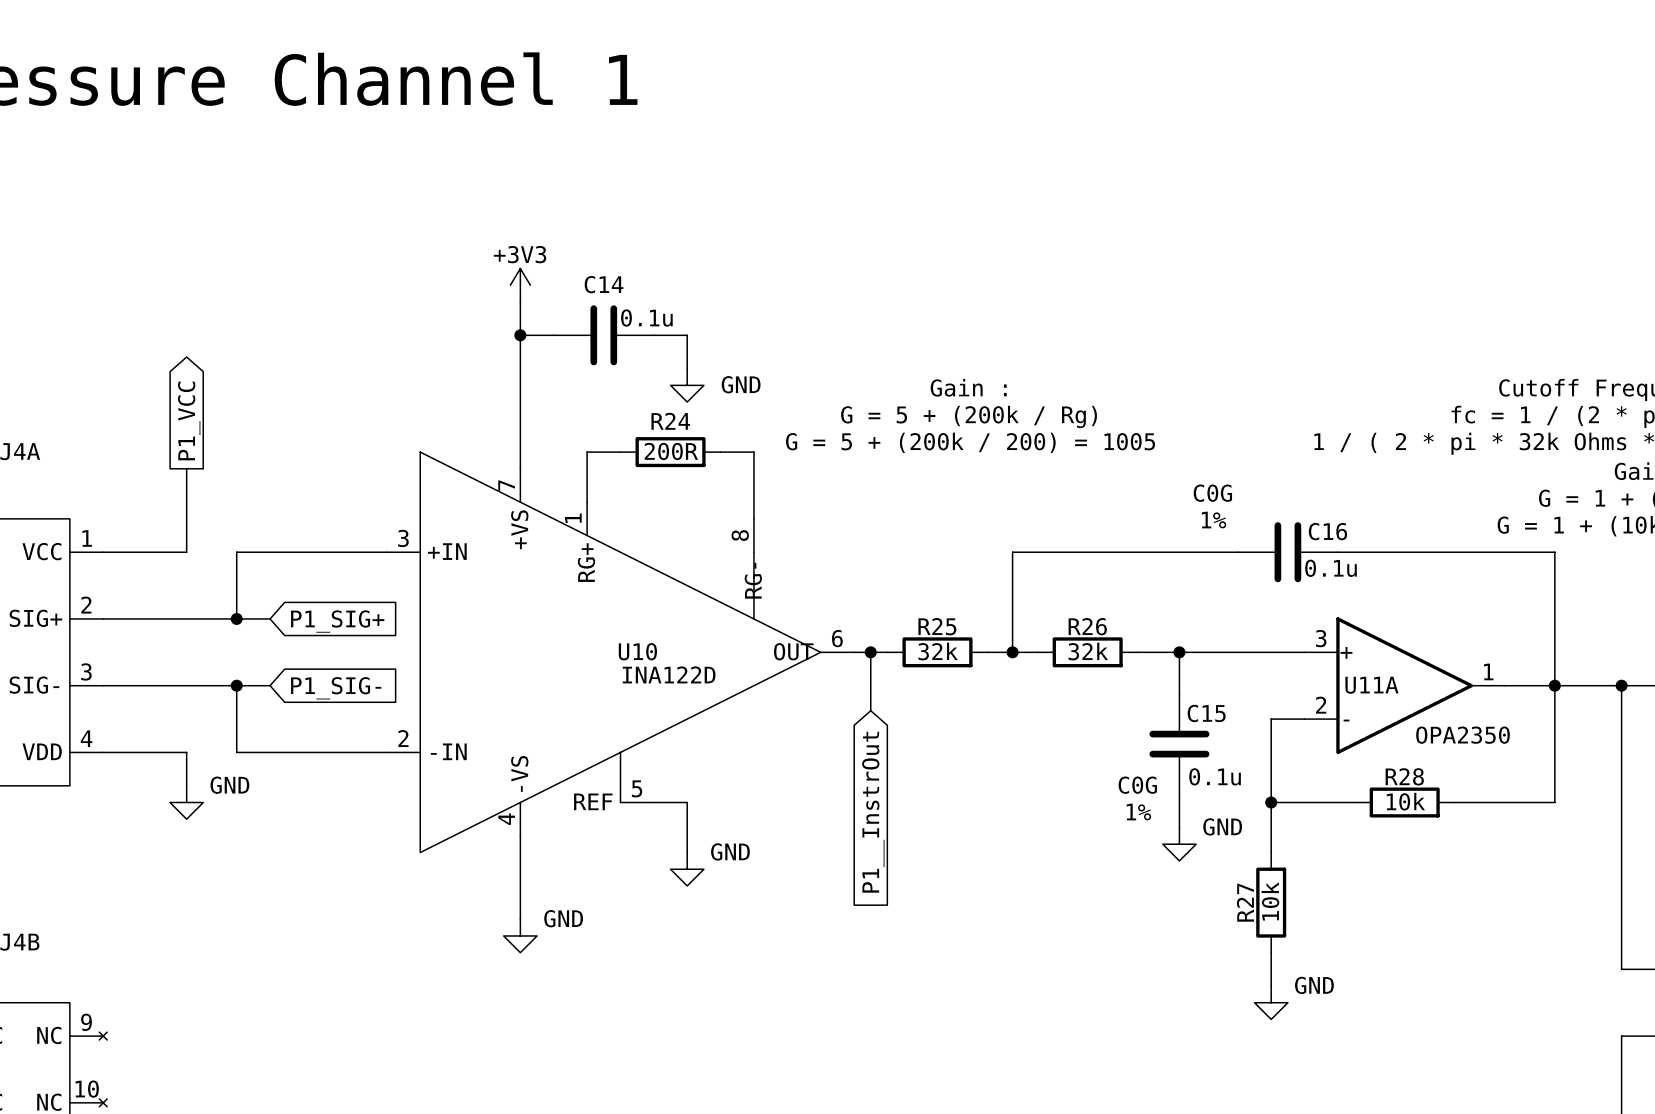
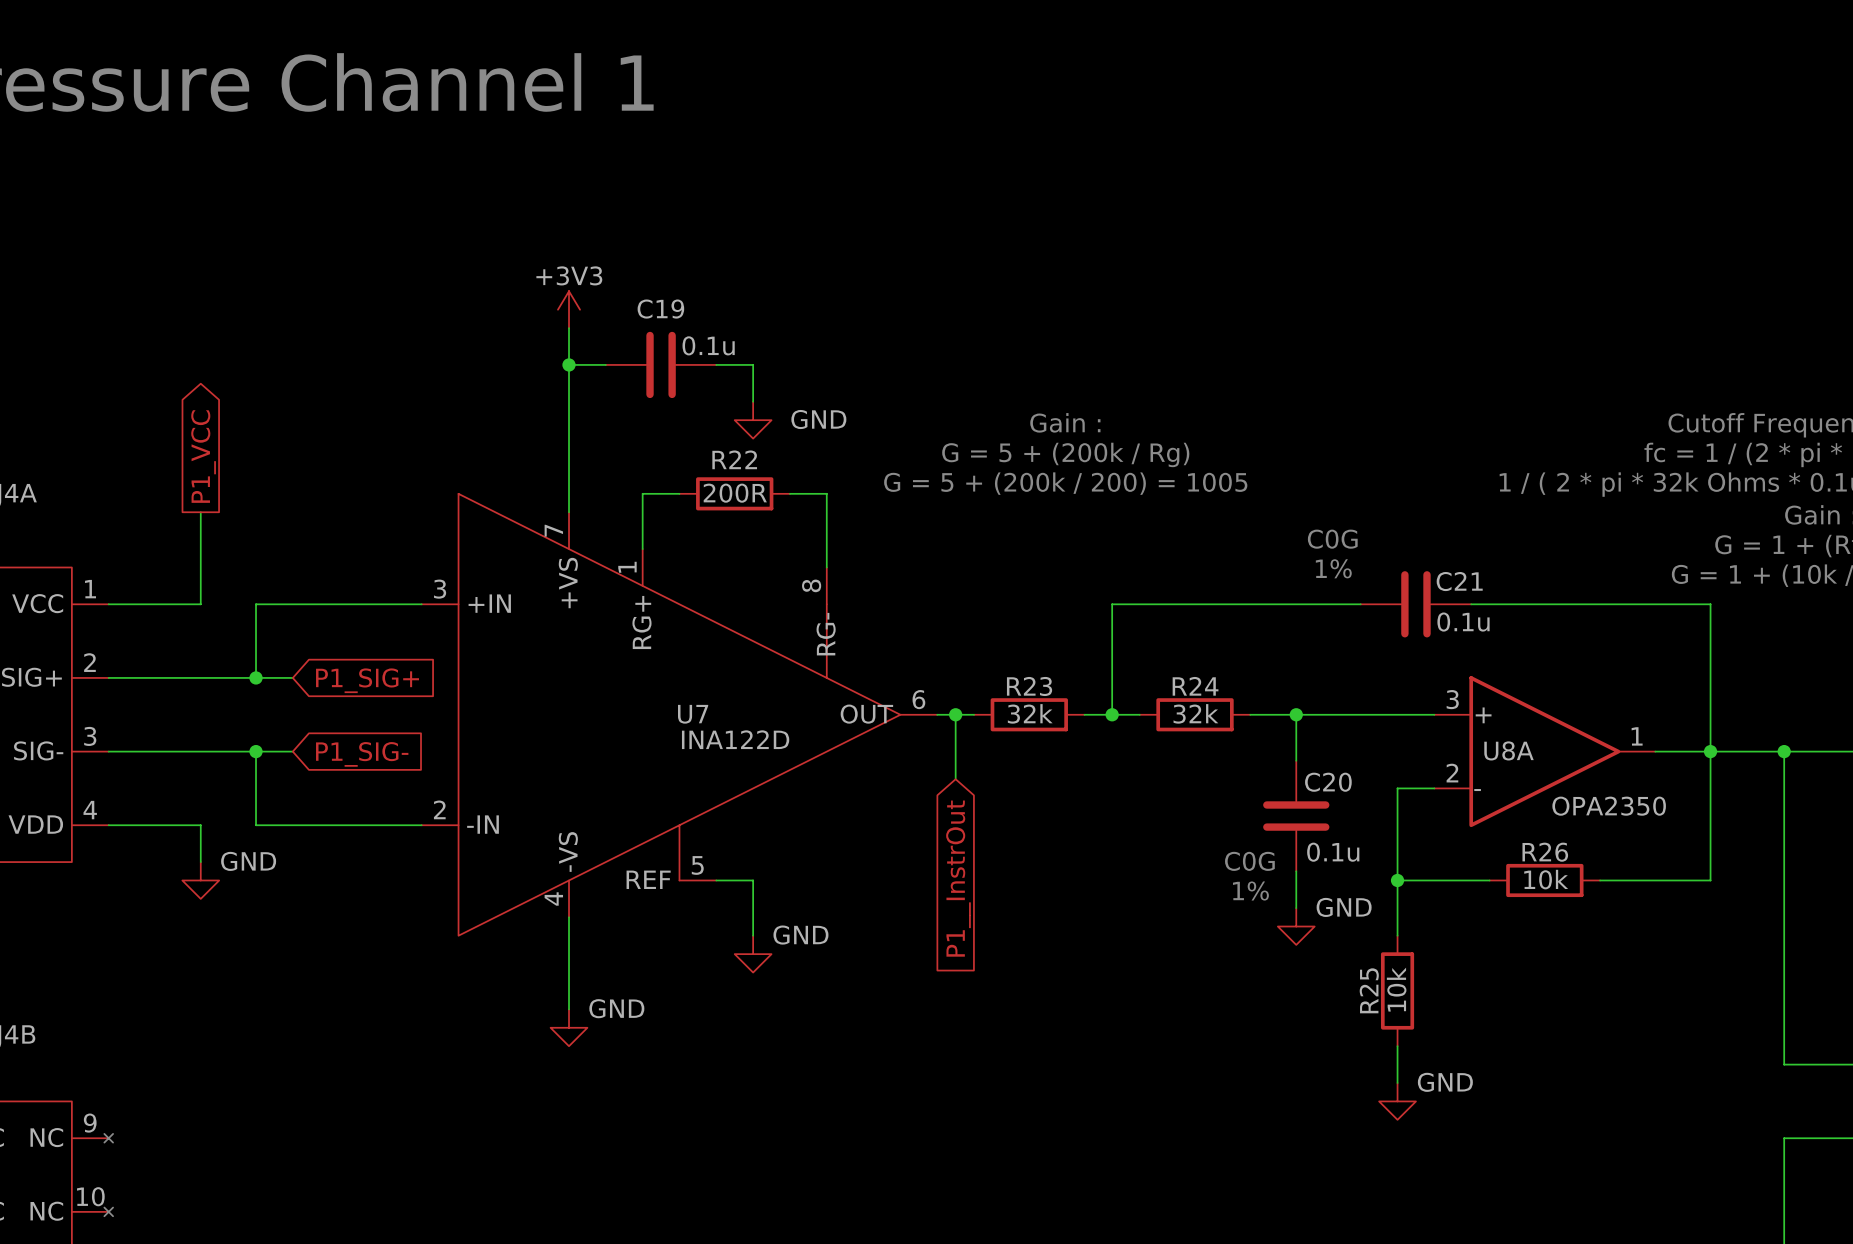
C14 name: C14 (604, 284) -> C19 (660, 309)
R24 name: R24 (670, 421) -> R22 (734, 459)
C16 name: C16 (1327, 531) -> C21 (1459, 581)
R25 name: R25 (937, 626) -> R23 (1029, 686)
R26 name: R26 (1087, 626) -> R24 (1195, 686)
U10 name: U10 (637, 651) -> U7 (693, 714)
U11A name: U11A (1371, 685) -> U8A (1509, 750)
C15 name: C15 (1206, 713) -> C20 (1328, 782)
R28 name: R28 (1404, 776) -> R26 (1545, 852)
R27 name: R27 (1245, 902) -> R25 (1369, 990)

